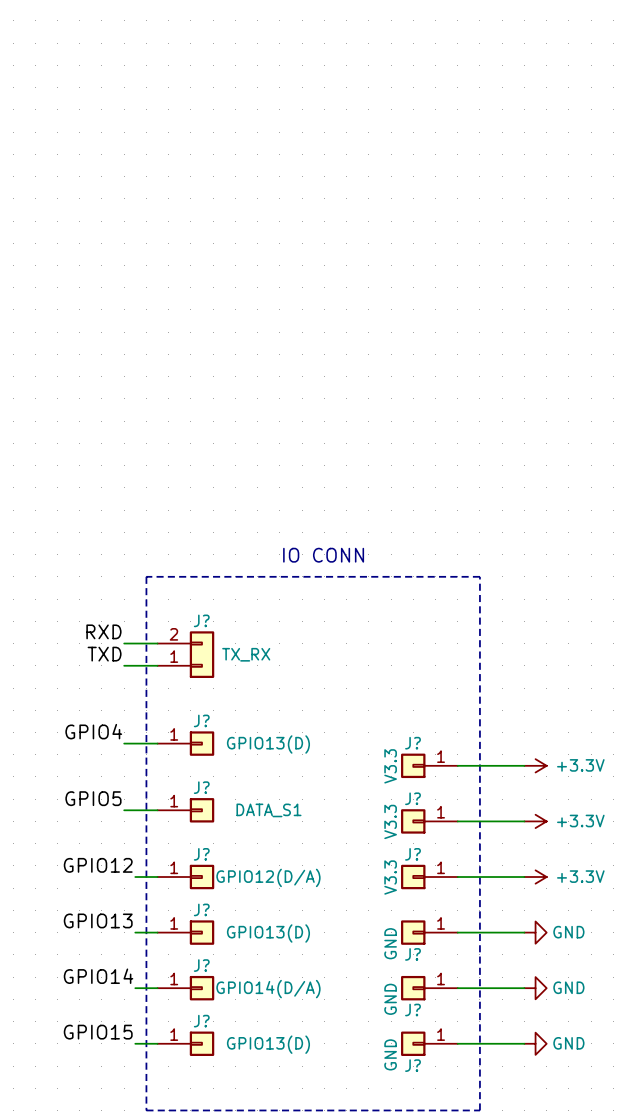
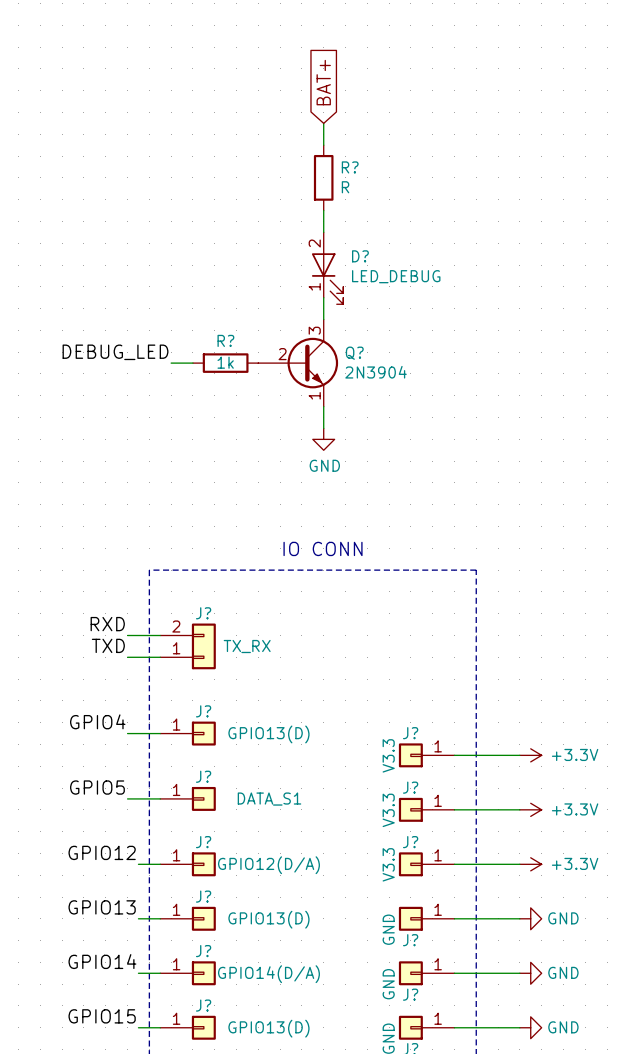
global label: none -> BAT+ (323, 82)
wire: none -> (323, 123) (323, 145)
R?: none -> R (323, 177)
wire: none -> (323, 210) (323, 232)
D?: none -> LED_DEBUG (327, 268)
wire: none -> (323, 297) (323, 319)
label: none -> DEBUG_LED (115, 352)
wire: none -> (171, 363) (192, 363)
R?: none -> 1k (225, 363)
Q?: none -> 2N3904 (298, 363)
wire: none -> (323, 406) (323, 428)
power symbol: none -> GND (323, 439)

